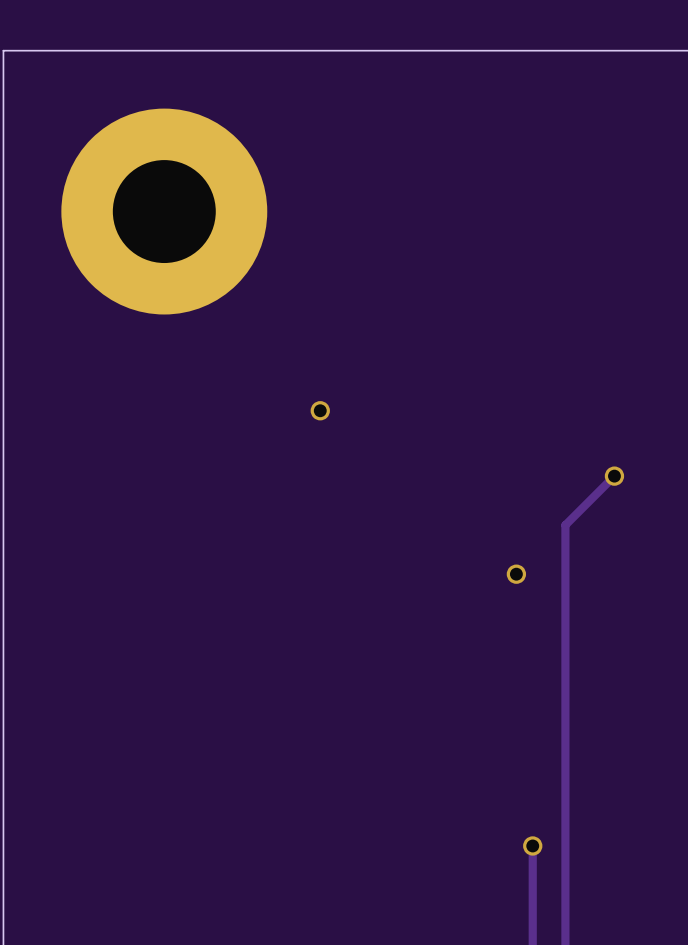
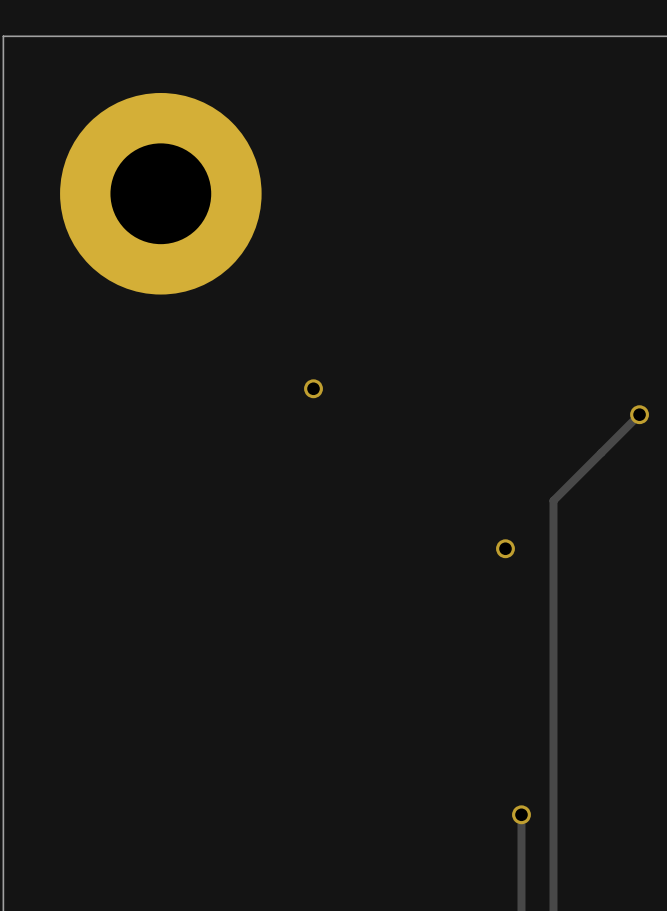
track: none -> (639, 414) (601, 452)
via position: (614, 476) -> (639, 414)

